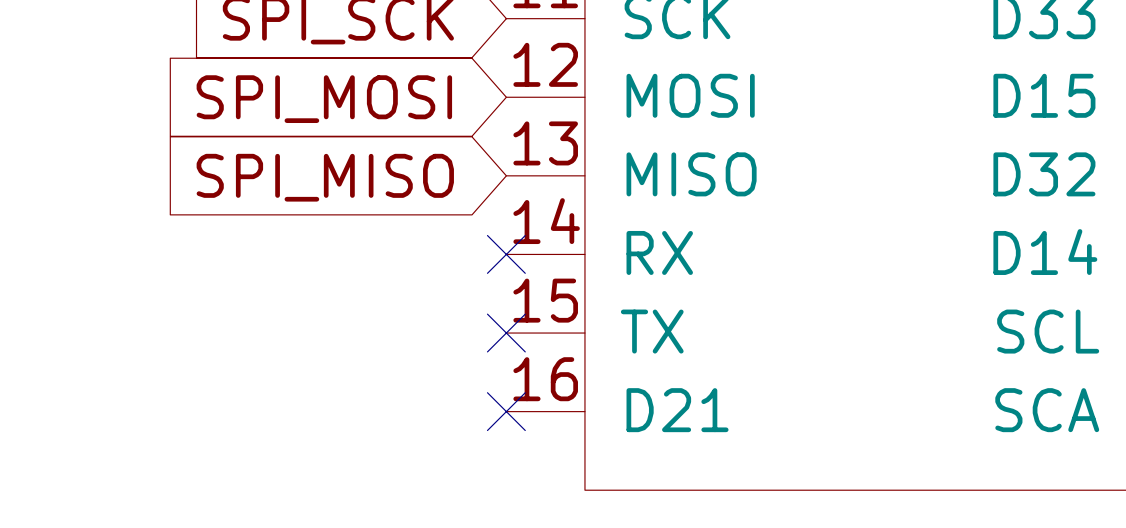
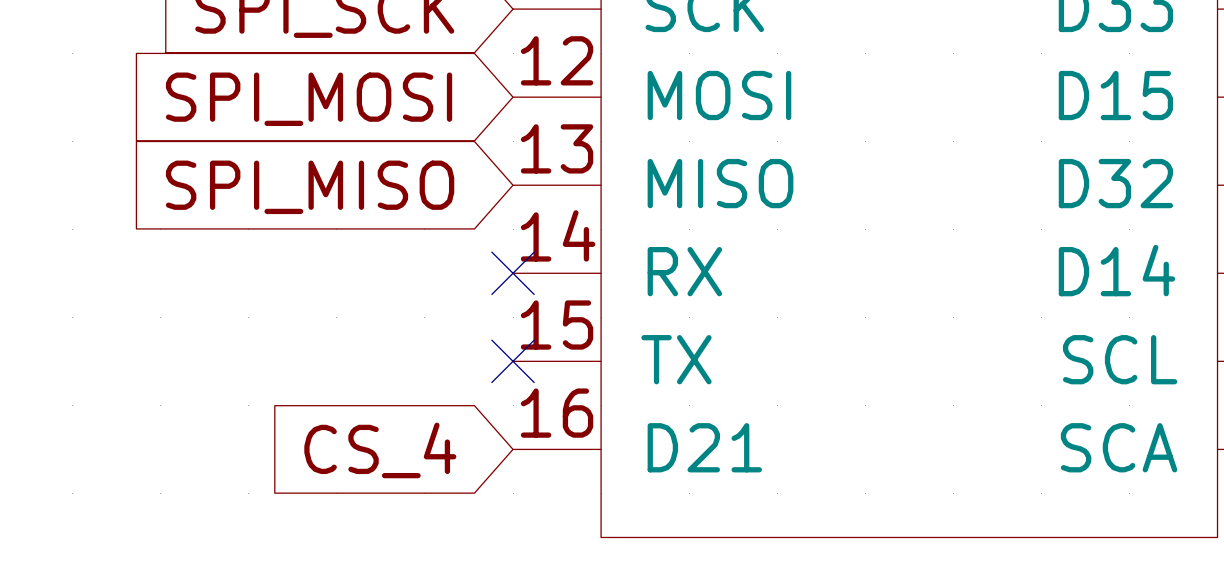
no-connect mark: (506, 411) -> none
global label: none -> CS_4 (380, 450)

